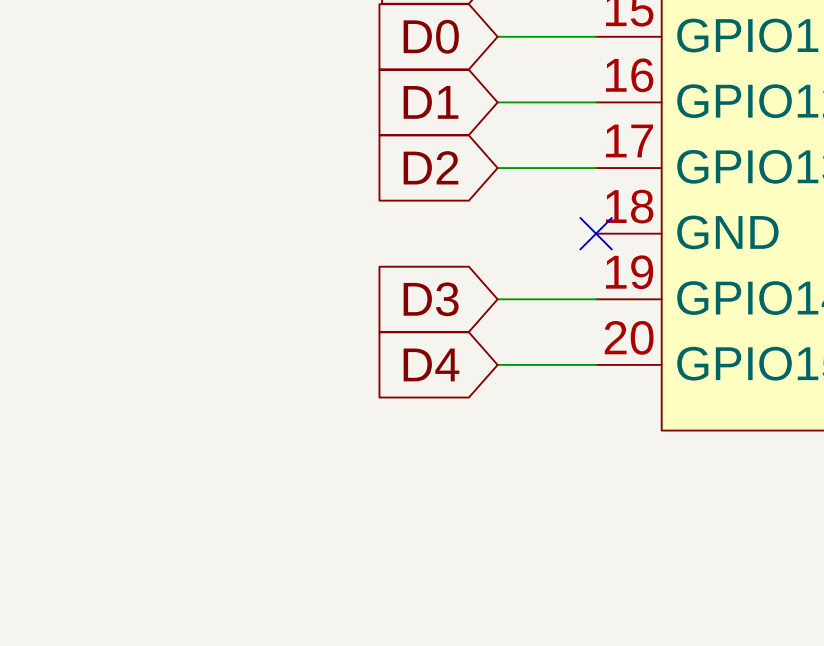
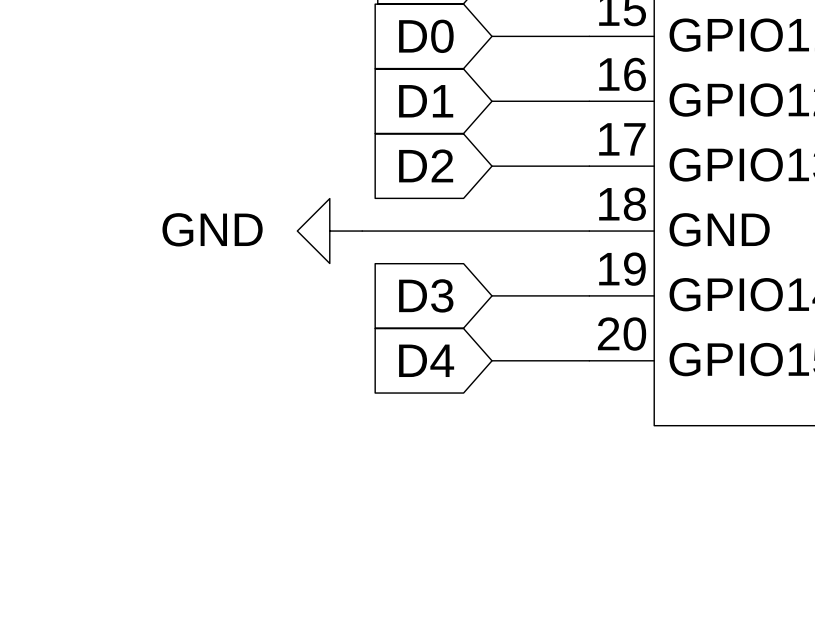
power symbol: none -> GND (329, 231)
wire: none -> (362, 231) (589, 231)
no-connect mark: (596, 233) -> none

